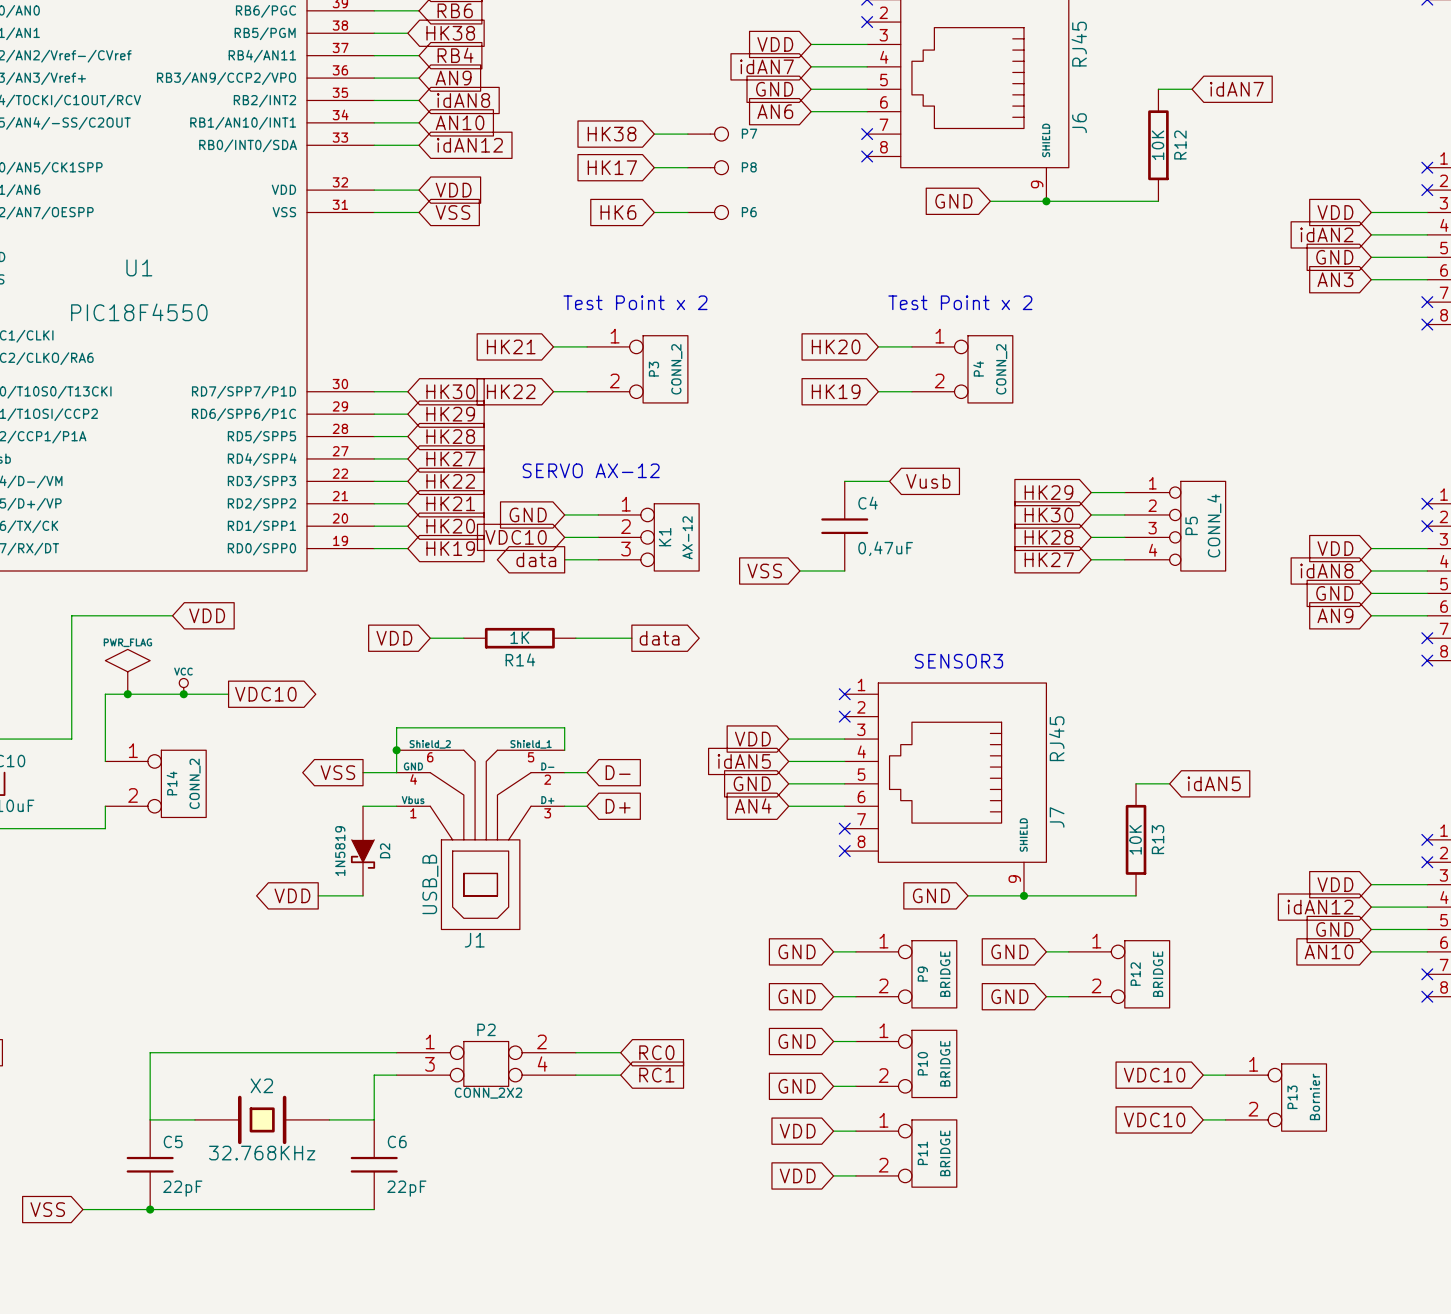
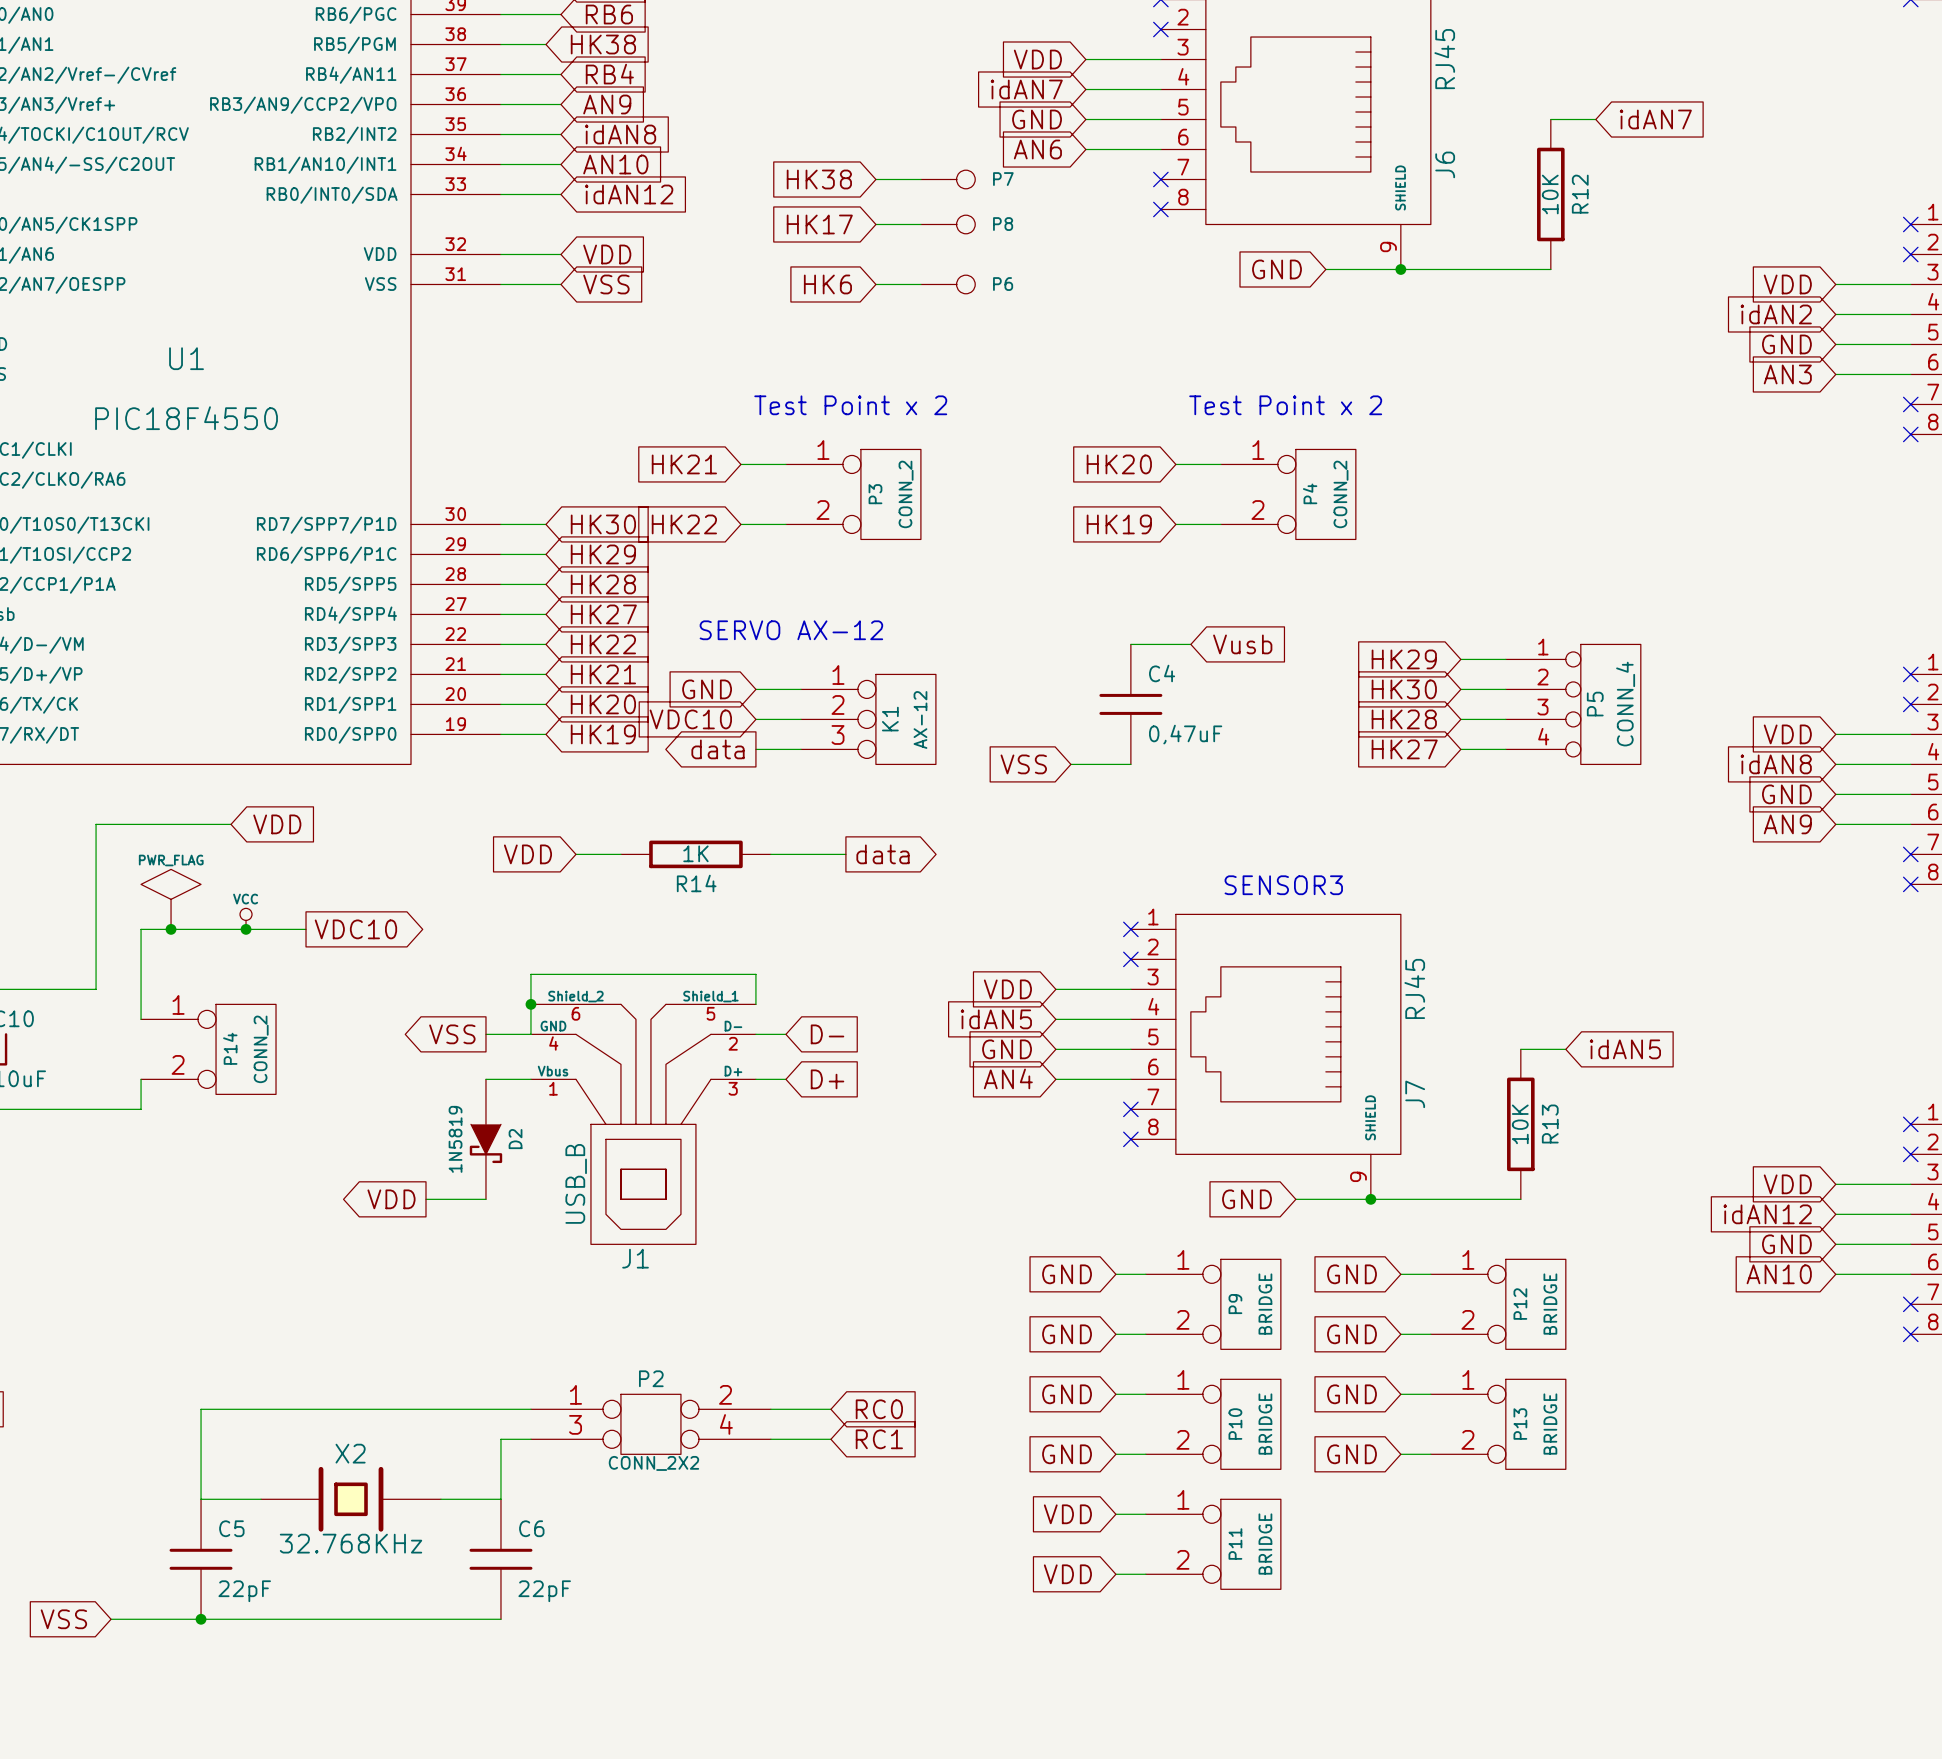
global label: none -> GND (1351, 1394)
global label: VDC10 (1154, 1075) -> none
wire: (1203, 1075) (1225, 1075) -> (1400, 1454) (1430, 1454)
global label: none -> GND (1351, 1454)
P13 value: Bornier (1314, 1096) -> BRIDGE (1550, 1424)
P13 position: (1276, 1097) -> (1498, 1424)
global label: VDC10 (1154, 1119) -> none
wire: (1203, 1119) (1225, 1119) -> (1400, 1394) (1430, 1394)

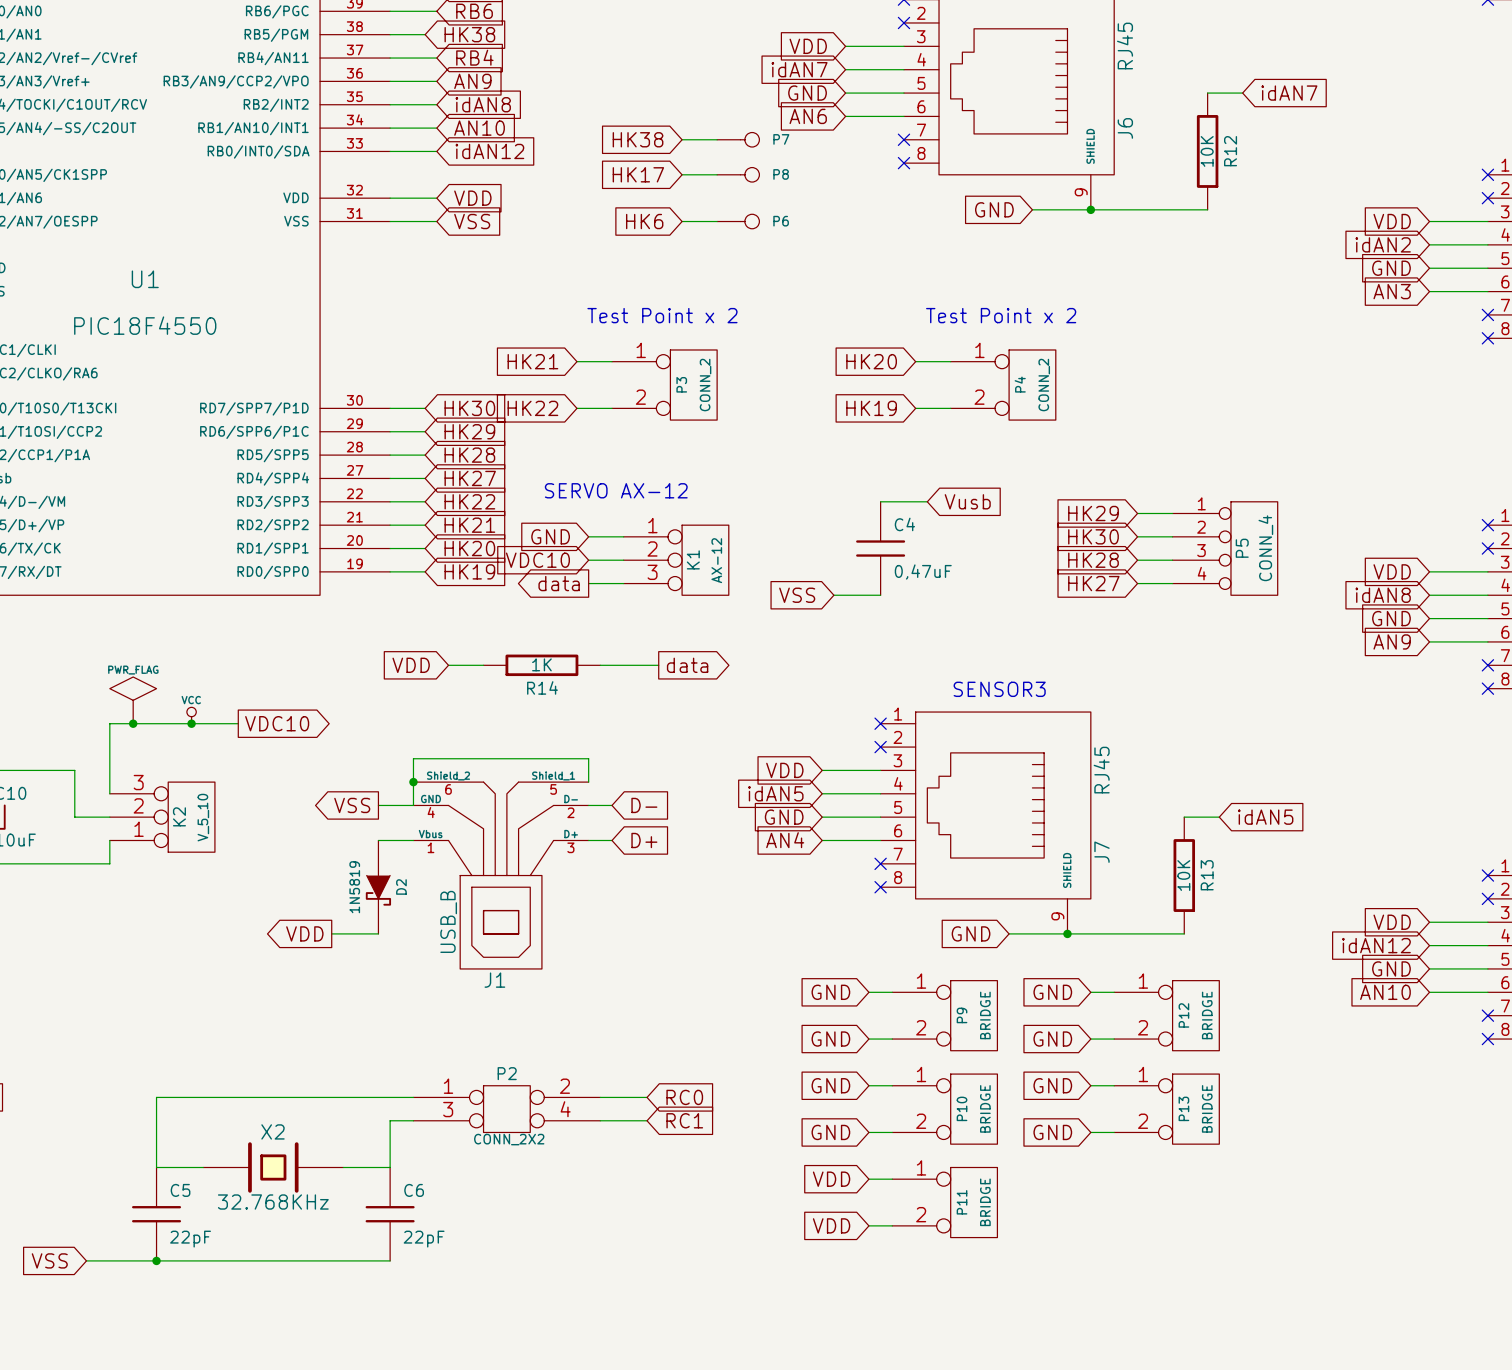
wire: (231, 824) (96, 824) (96, 989) -> (109, 817) (74, 817) (74, 770)
global label: VDD (277, 824) -> none
P14: CONN_2 (208, 1049) -> none
K2: none -> V_5_10 (162, 817)

